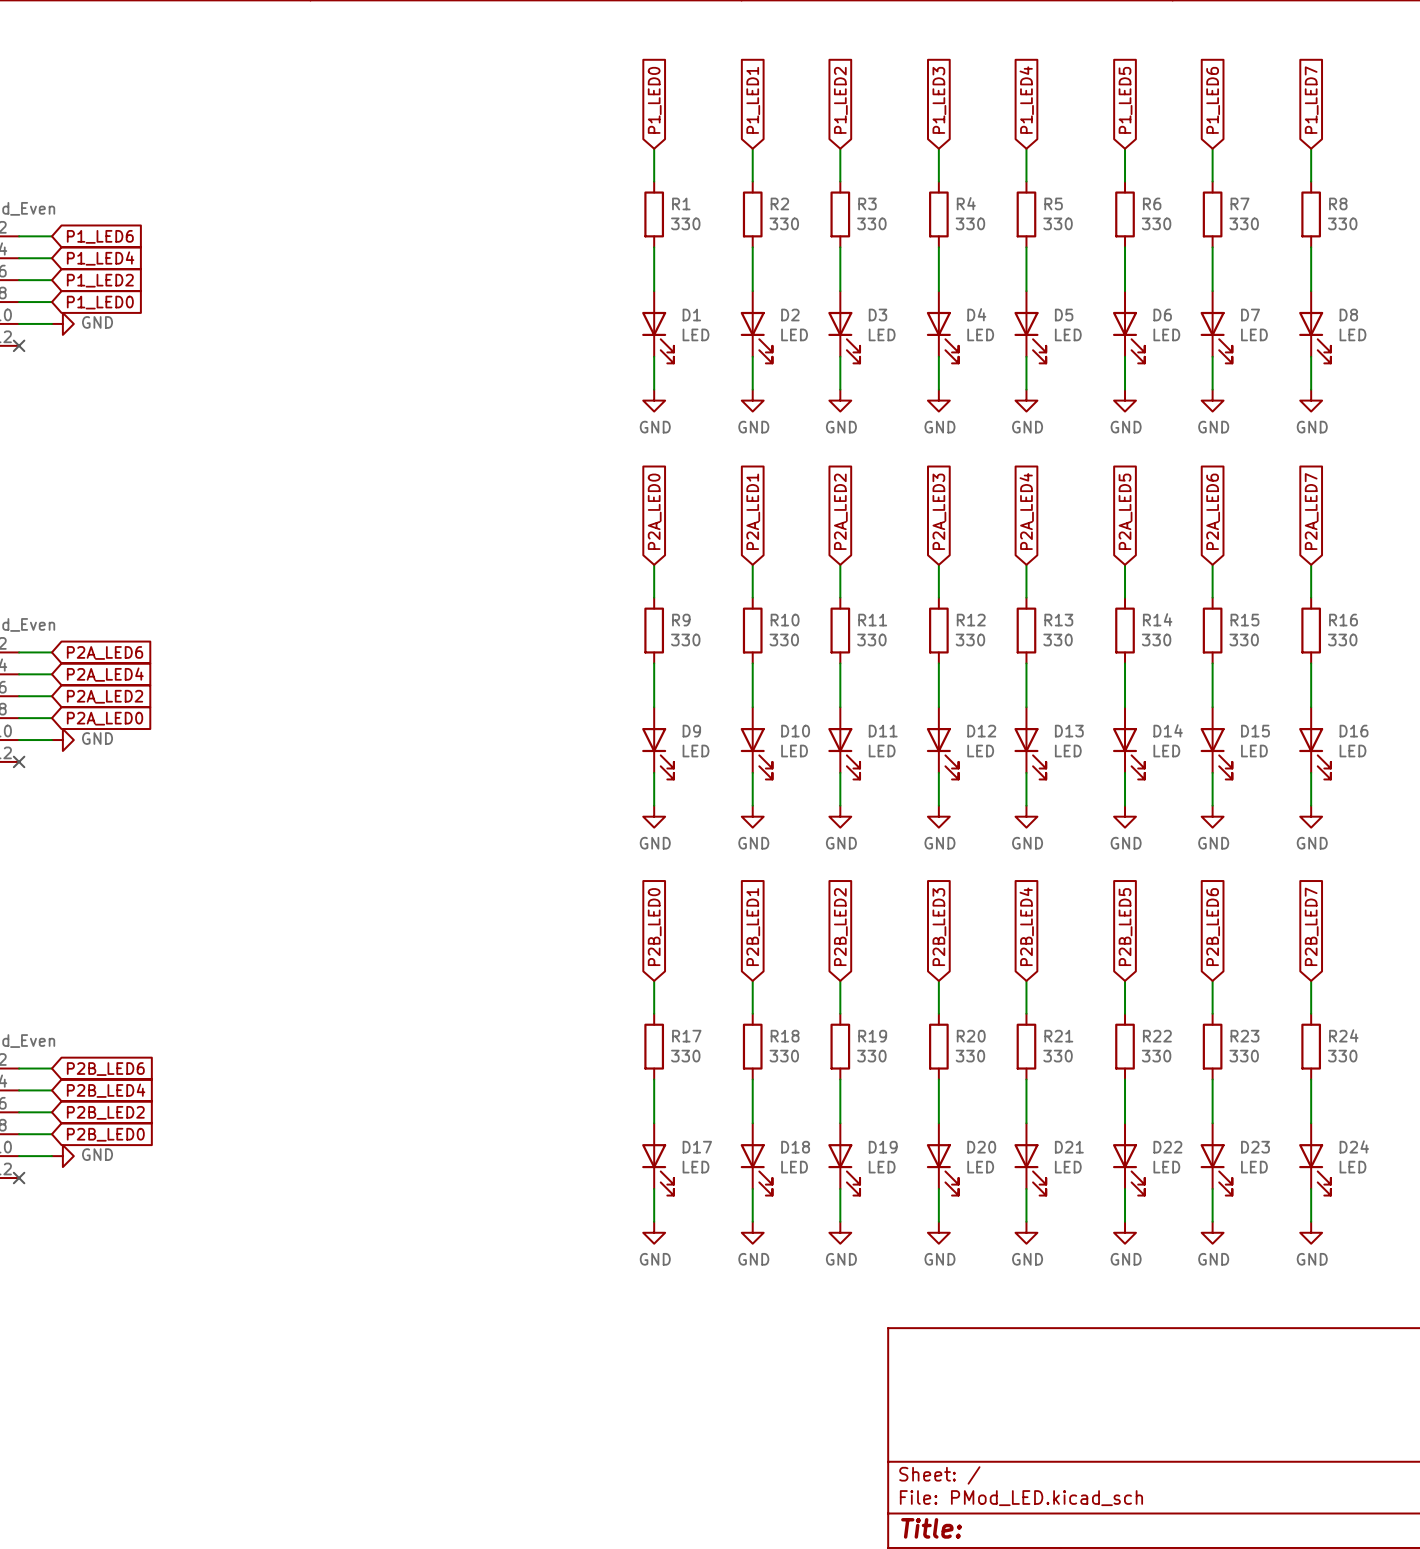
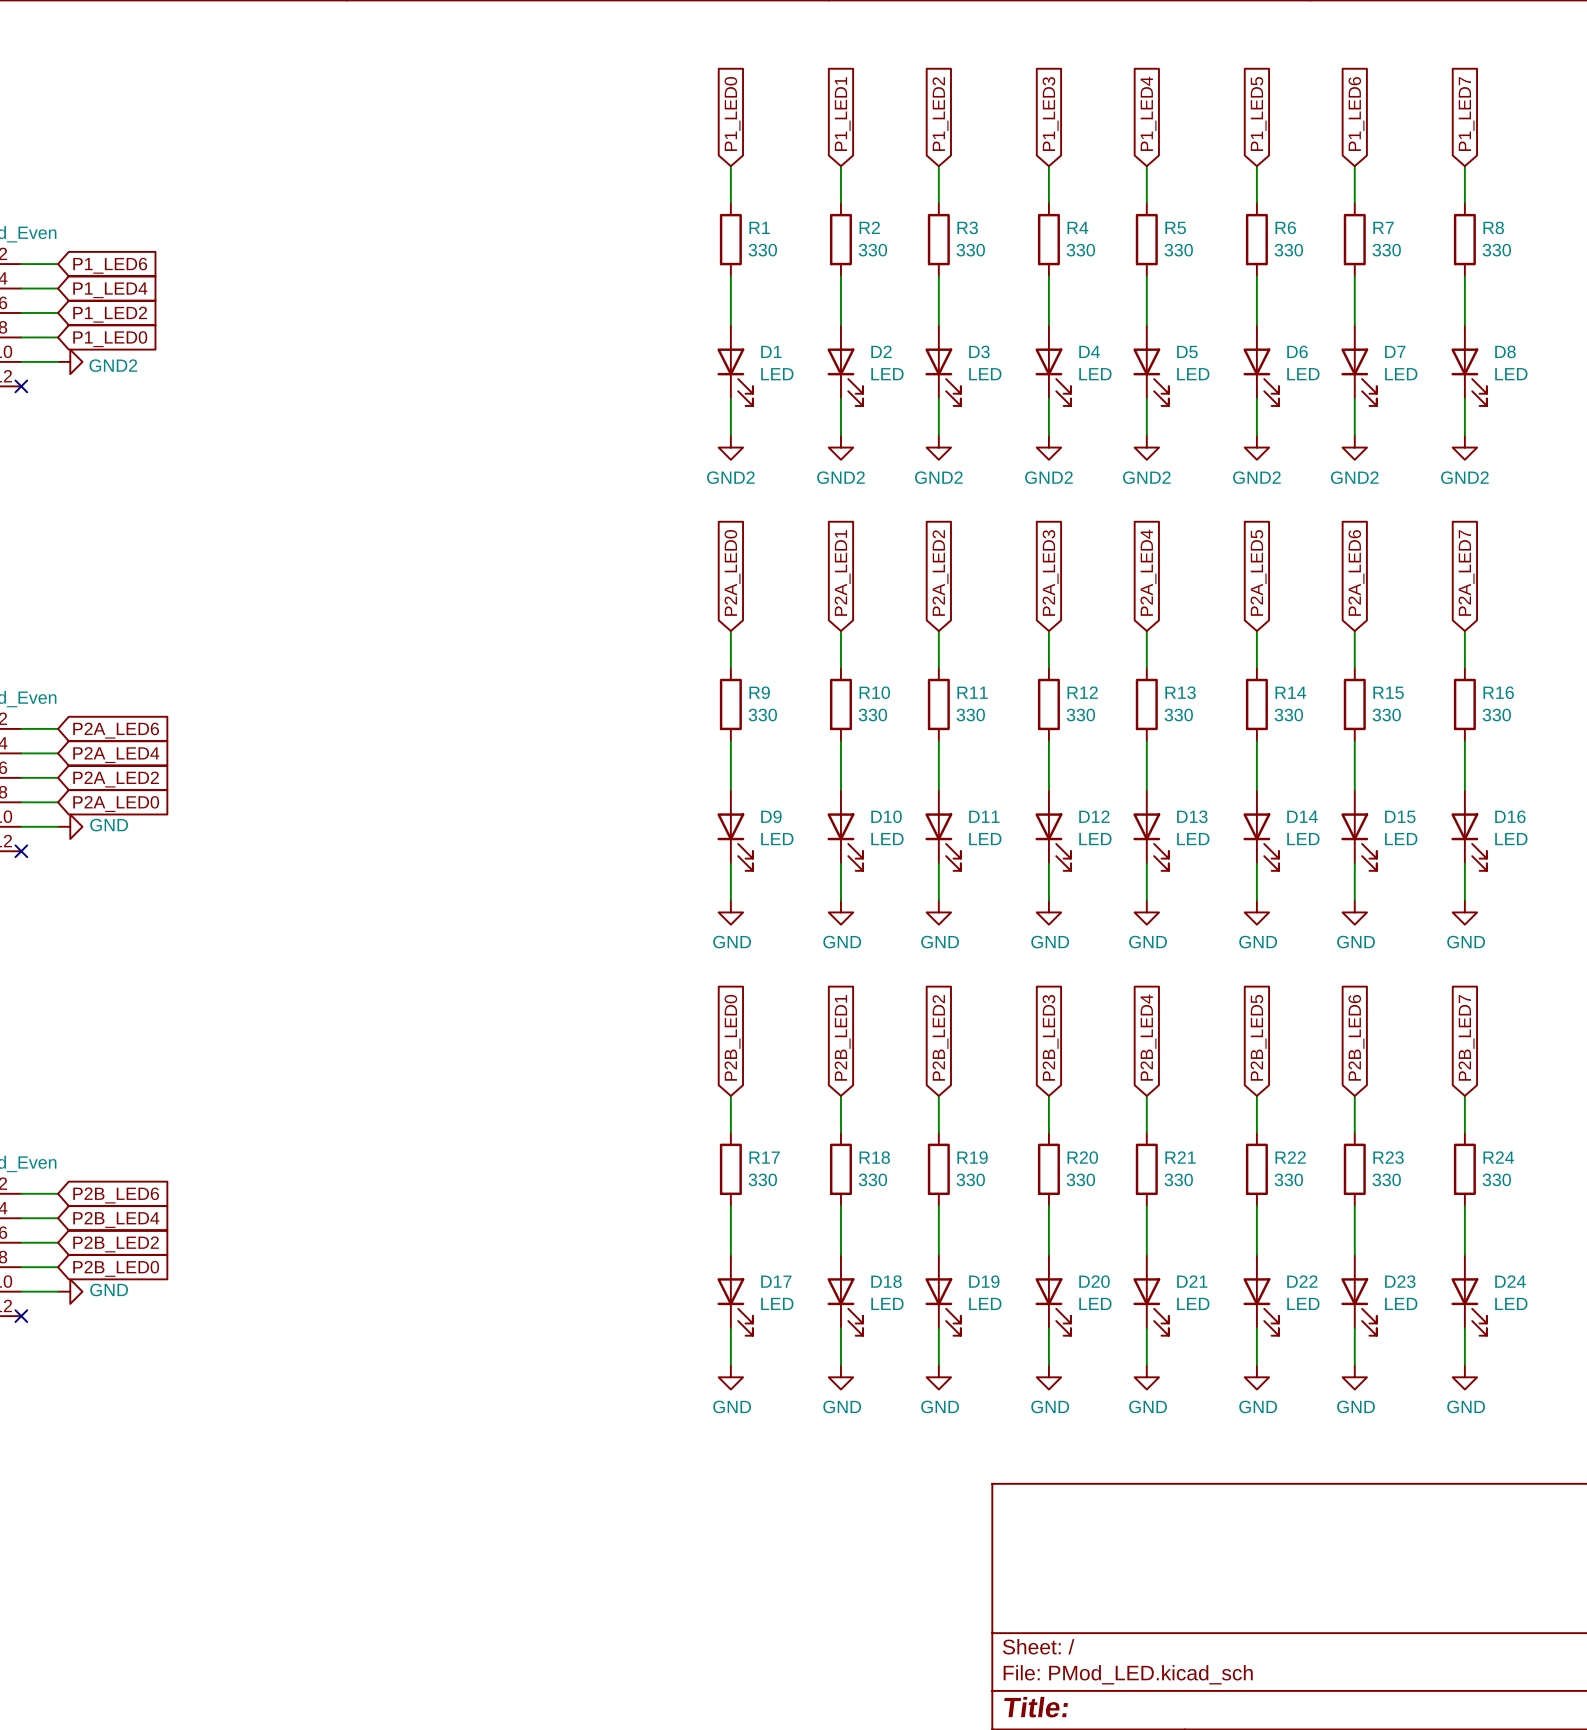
power symbol: GND (62, 323) -> GND2 (70, 361)
power symbol: GND (654, 400) -> GND2 (730, 447)
power symbol: GND (752, 400) -> GND2 (840, 447)
power symbol: GND (840, 400) -> GND2 (938, 447)
power symbol: GND (938, 400) -> GND2 (1048, 447)
power symbol: GND (1026, 400) -> GND2 (1146, 447)
power symbol: GND (1125, 400) -> GND2 (1256, 447)
power symbol: GND (1212, 400) -> GND2 (1354, 447)
power symbol: GND (1311, 400) -> GND2 (1464, 447)

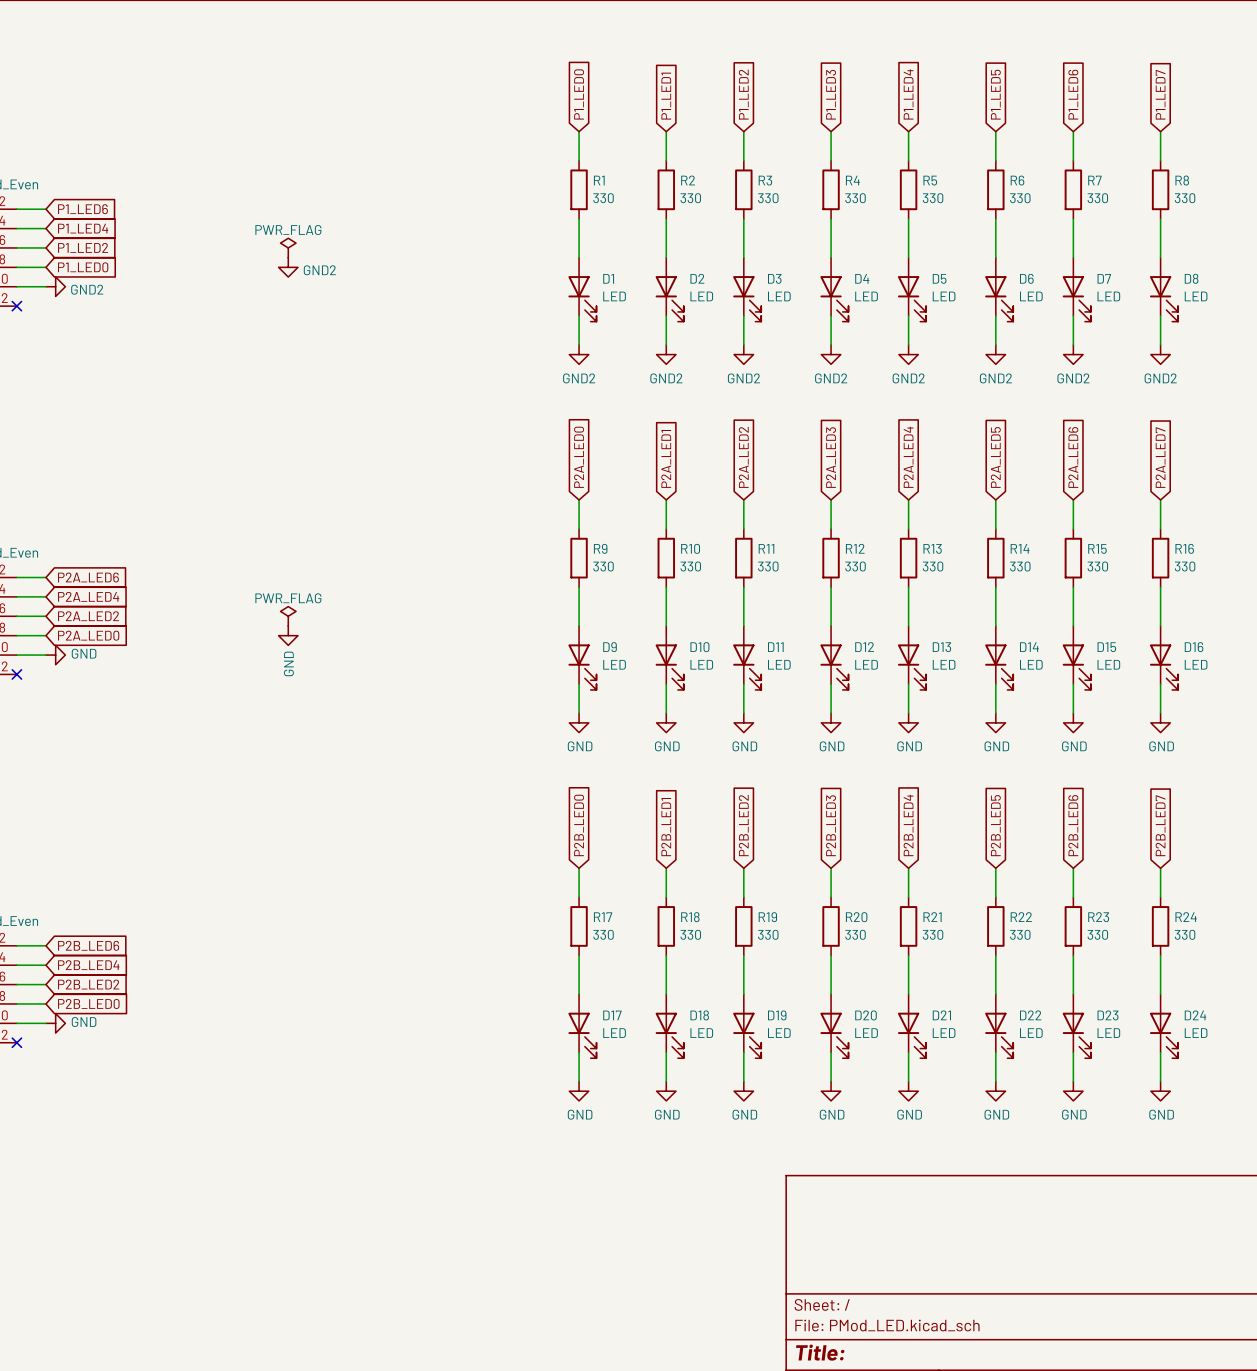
power symbol: none -> PWR_FLAG (288, 247)
power symbol: none -> GND2 (288, 267)
power symbol: none -> PWR_FLAG (288, 616)
power symbol: none -> GND (288, 635)

